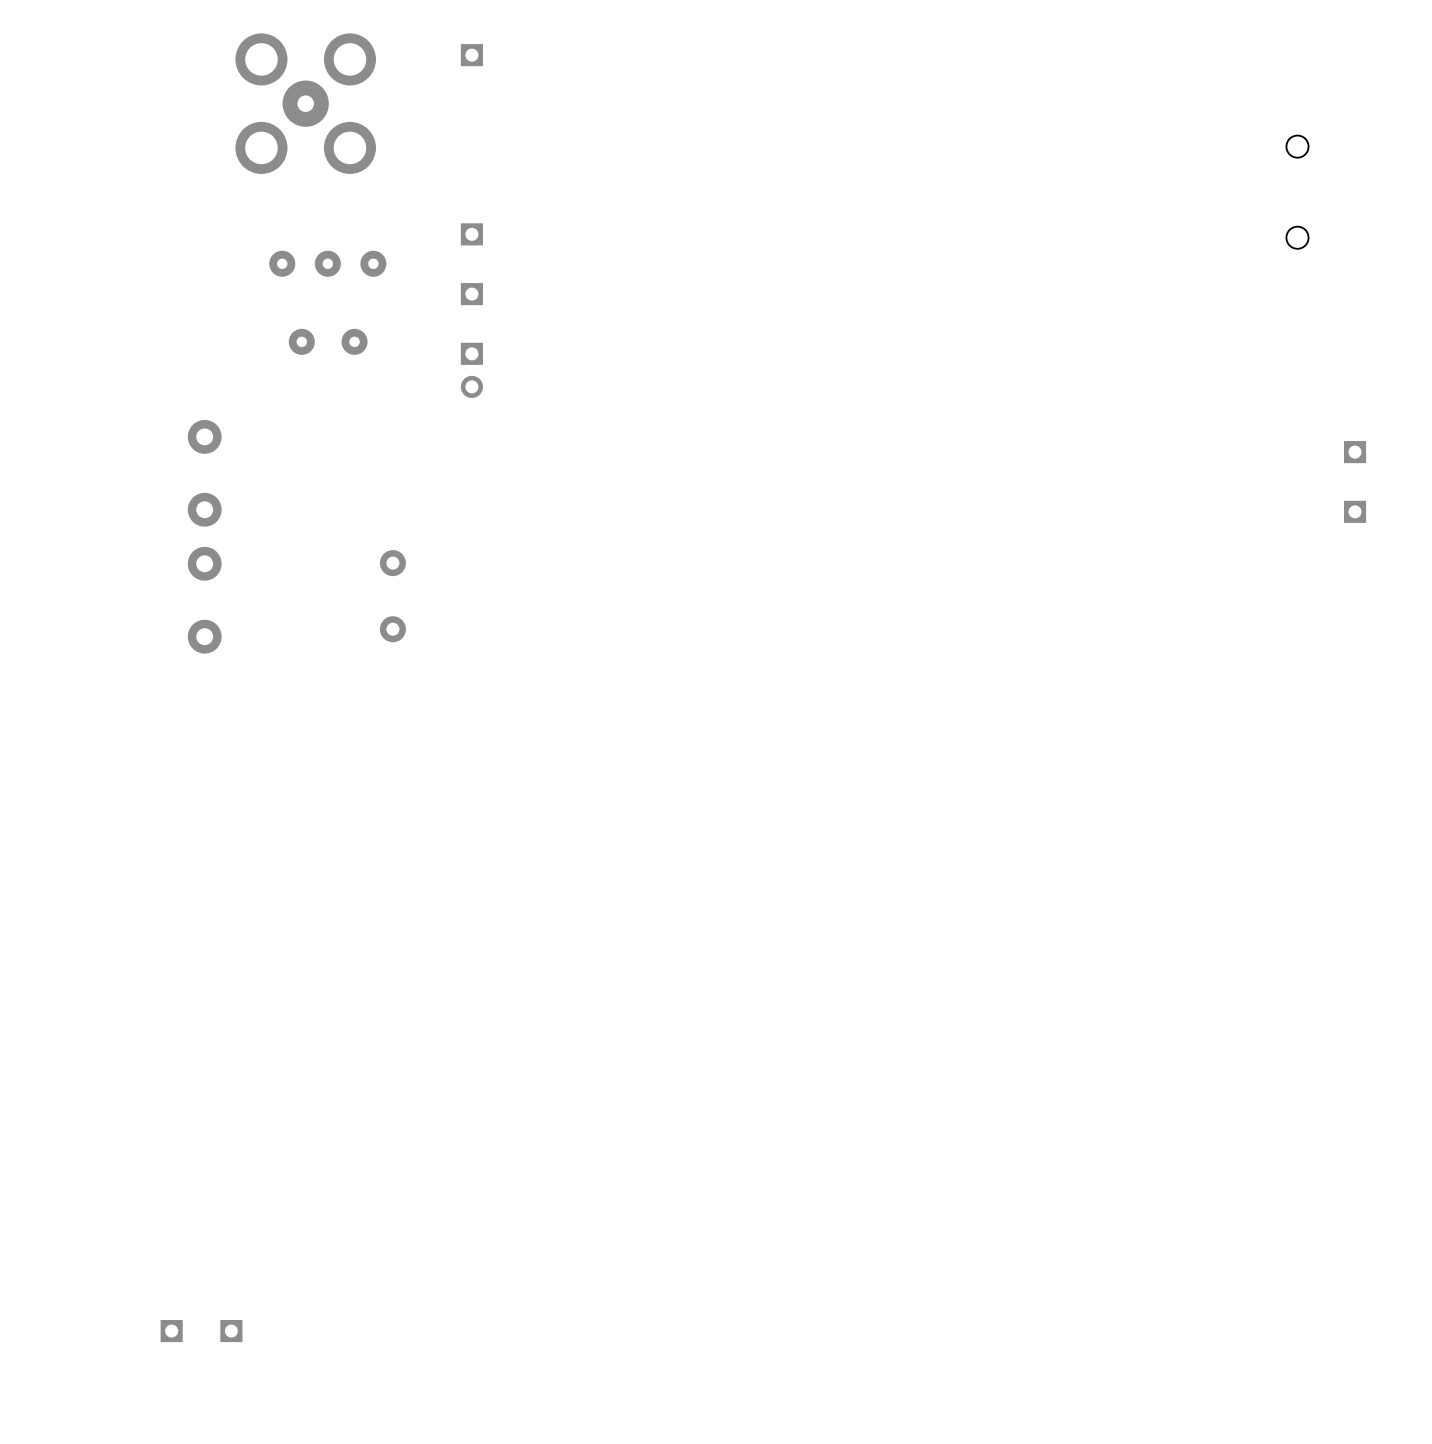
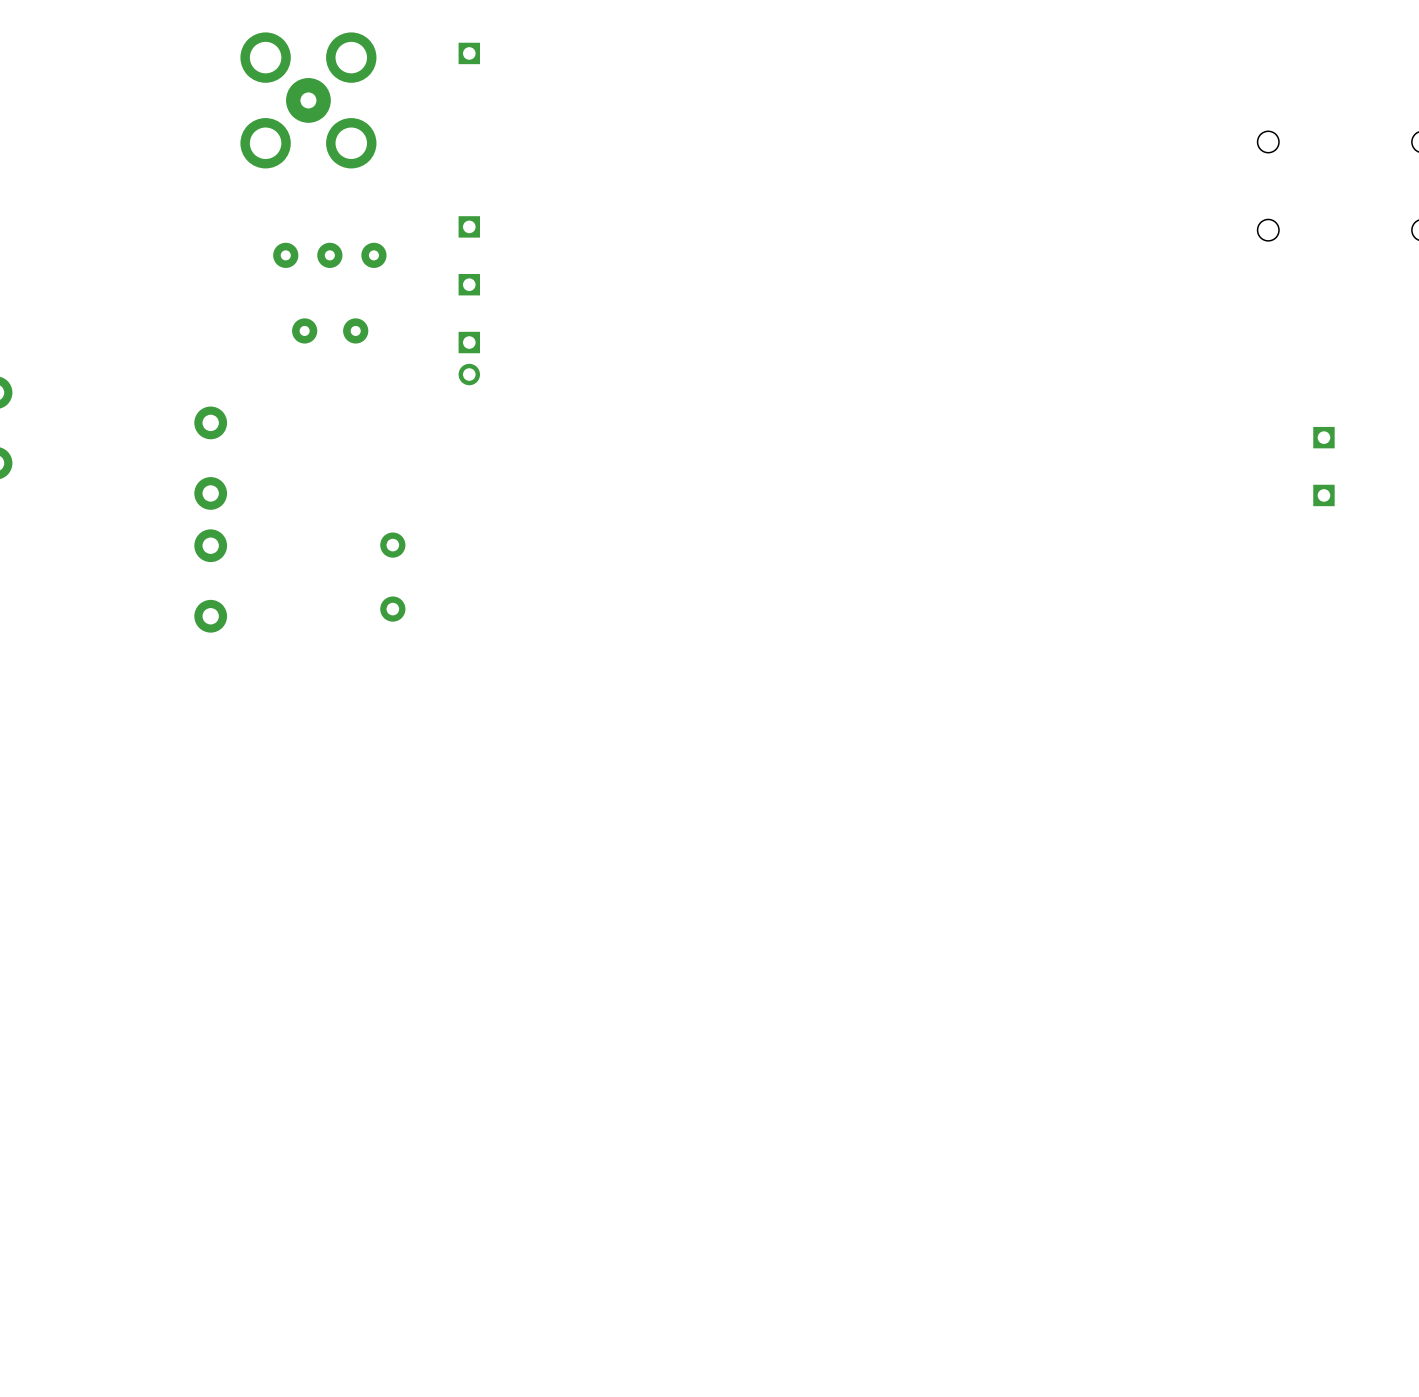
part: (171, 1331) -> none
part: (231, 1331) -> none

